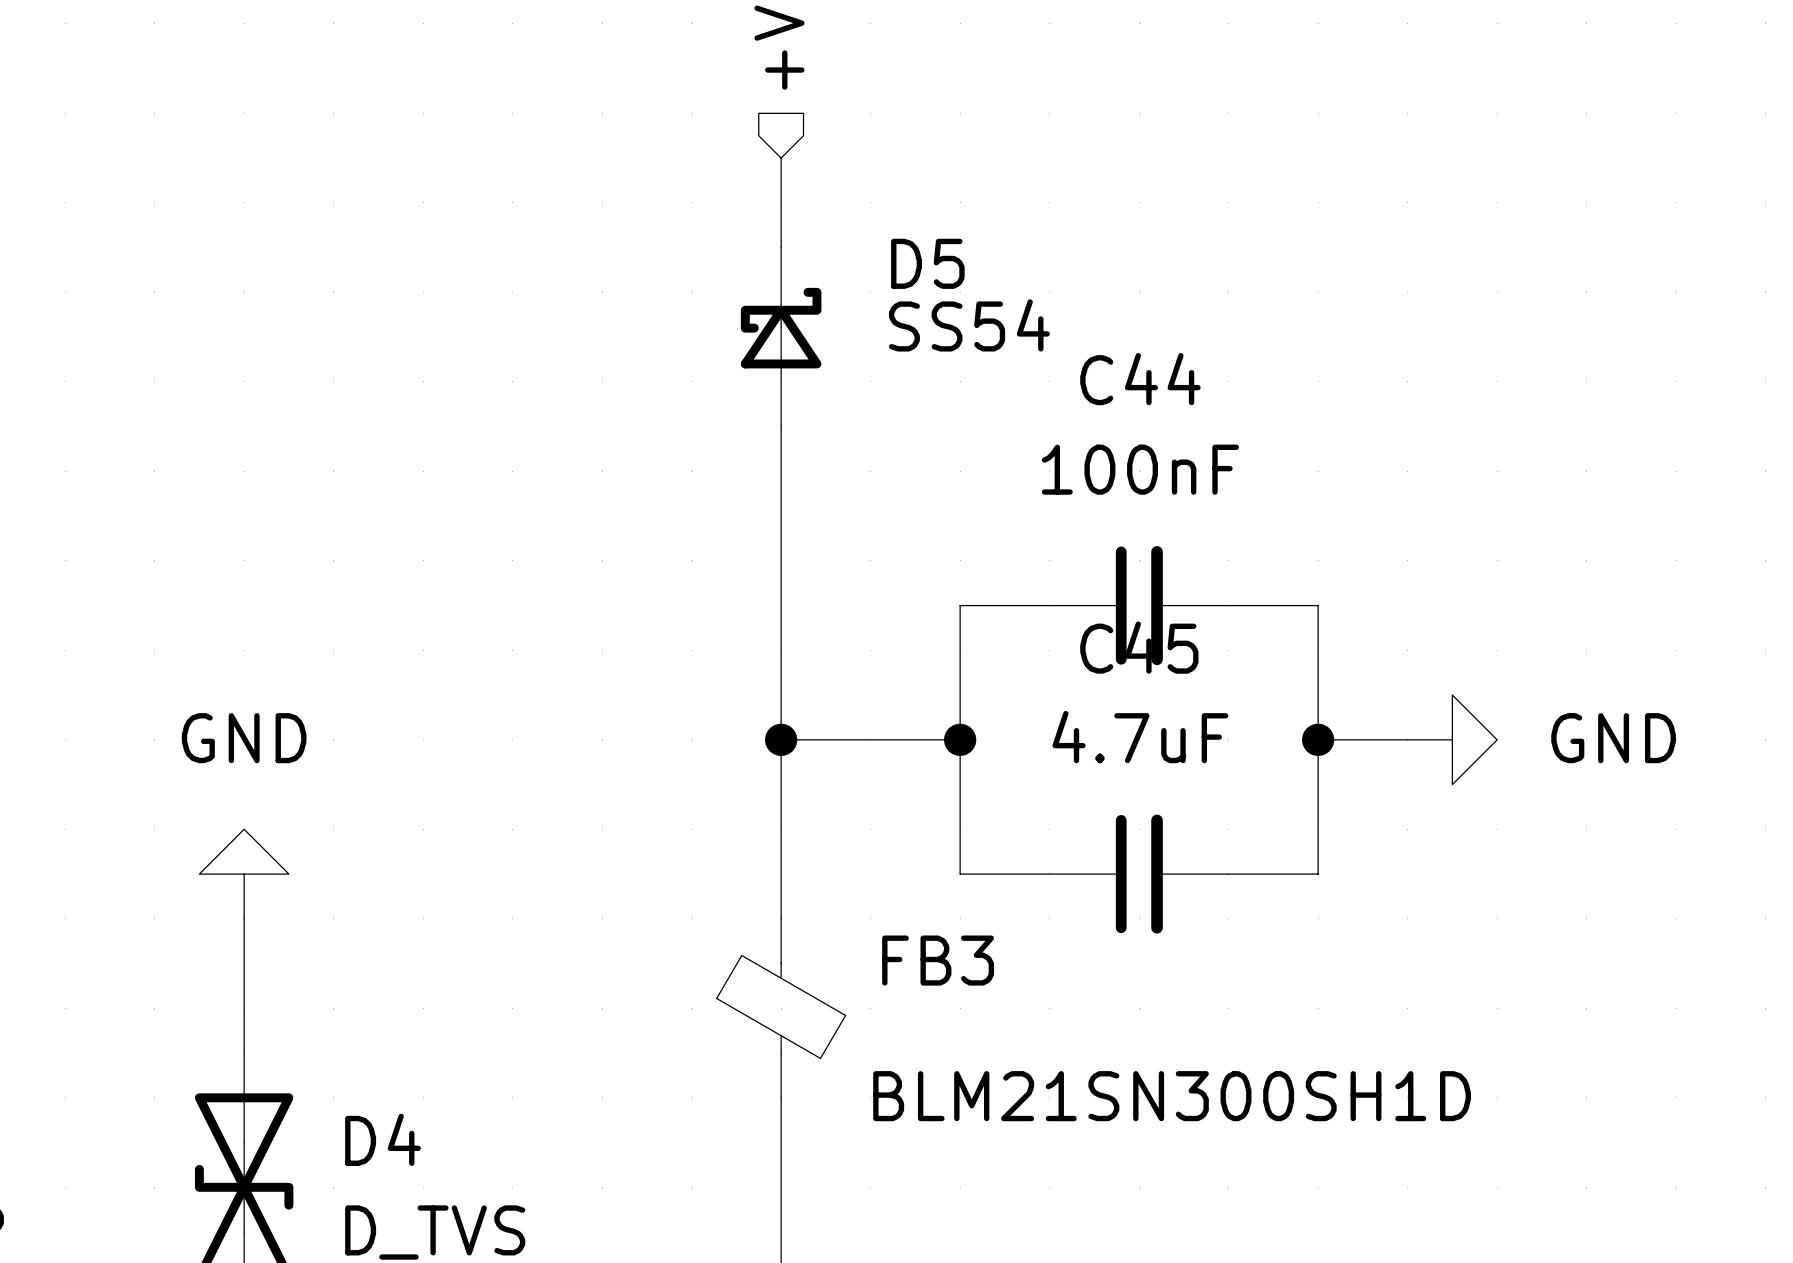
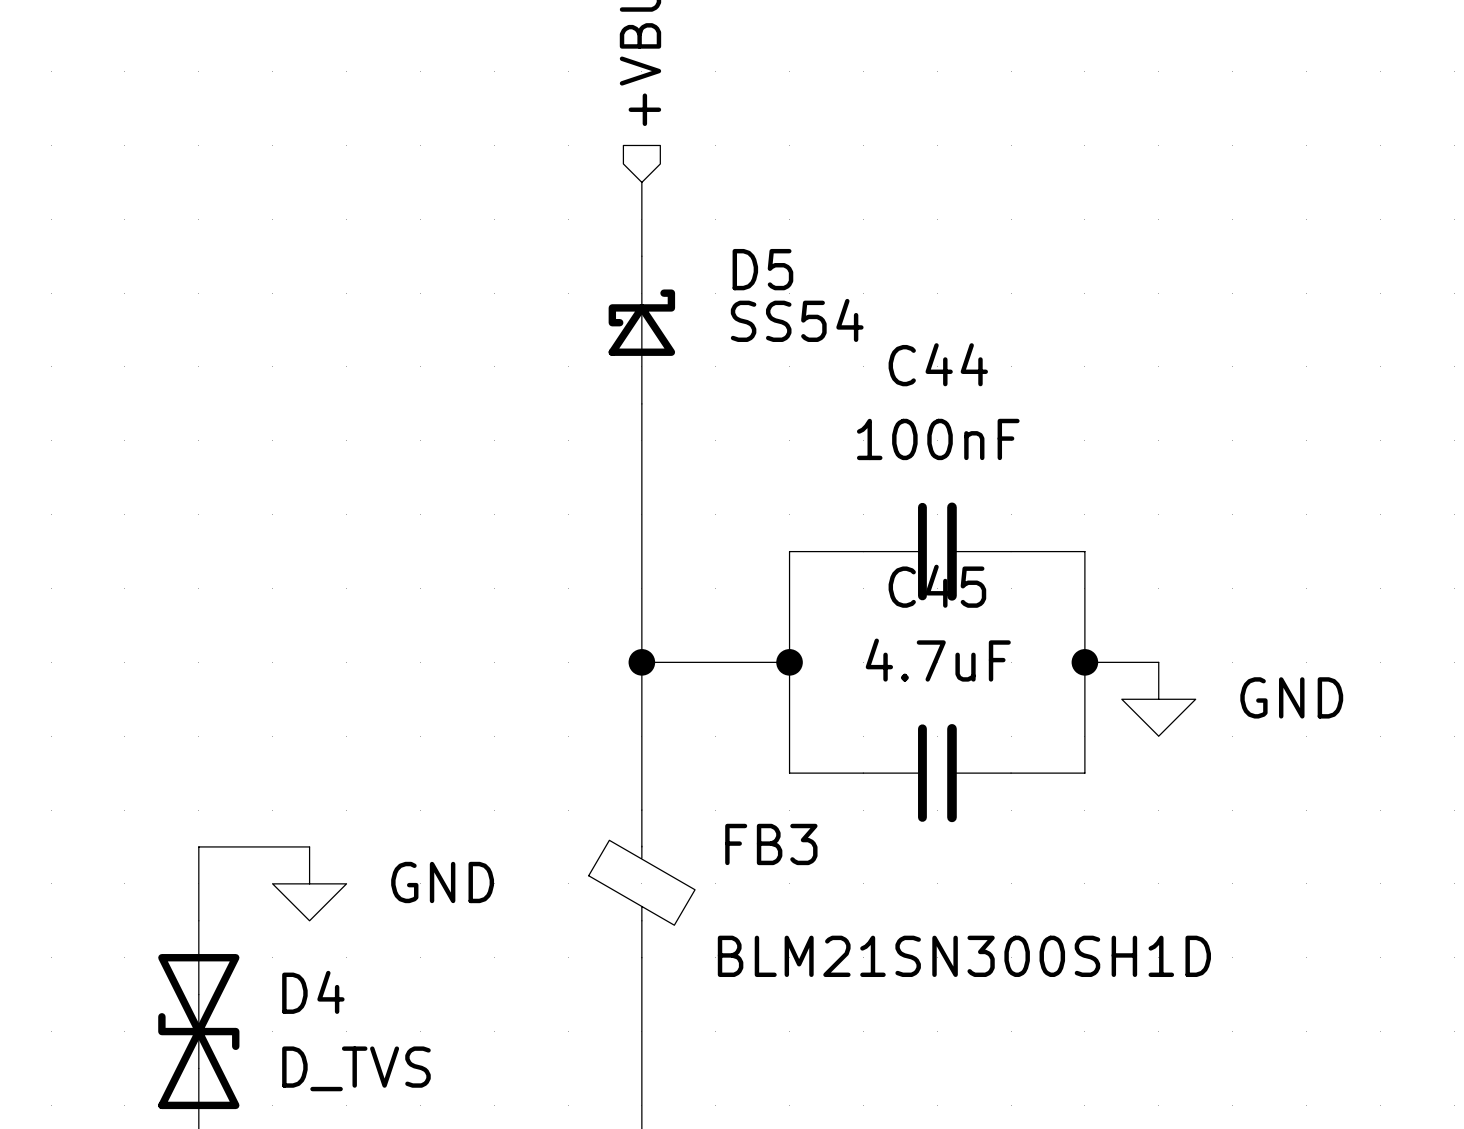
power symbol text position: GND (244, 738) -> GND (442, 882)
power symbol rotation: 0° (1452, 739) -> 90° clockwise (1158, 699)
power symbol position: GND (1452, 739) -> GND (1158, 699)
power symbol rotation: 0° (244, 874) -> 180° (309, 883)
power symbol position: GND (244, 874) -> GND (309, 883)
wire: (244, 918) (244, 963) -> (309, 846) (198, 846)

